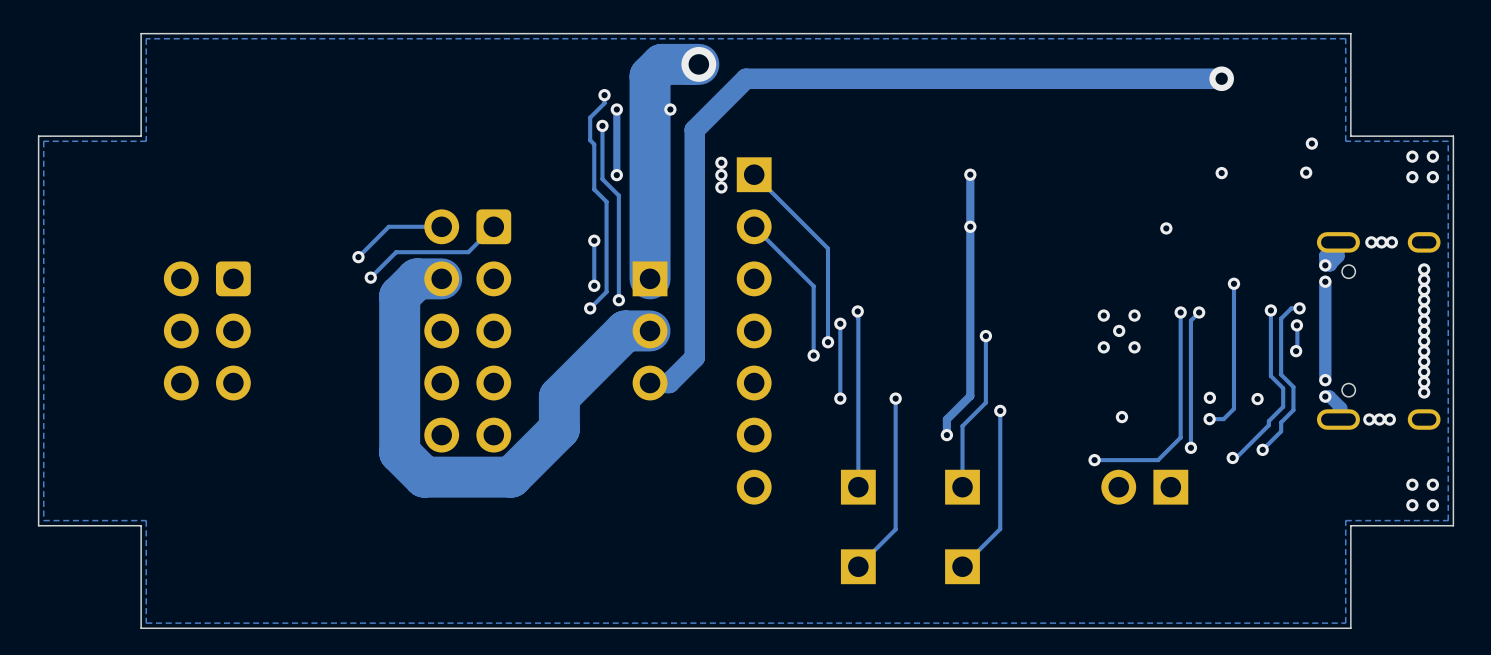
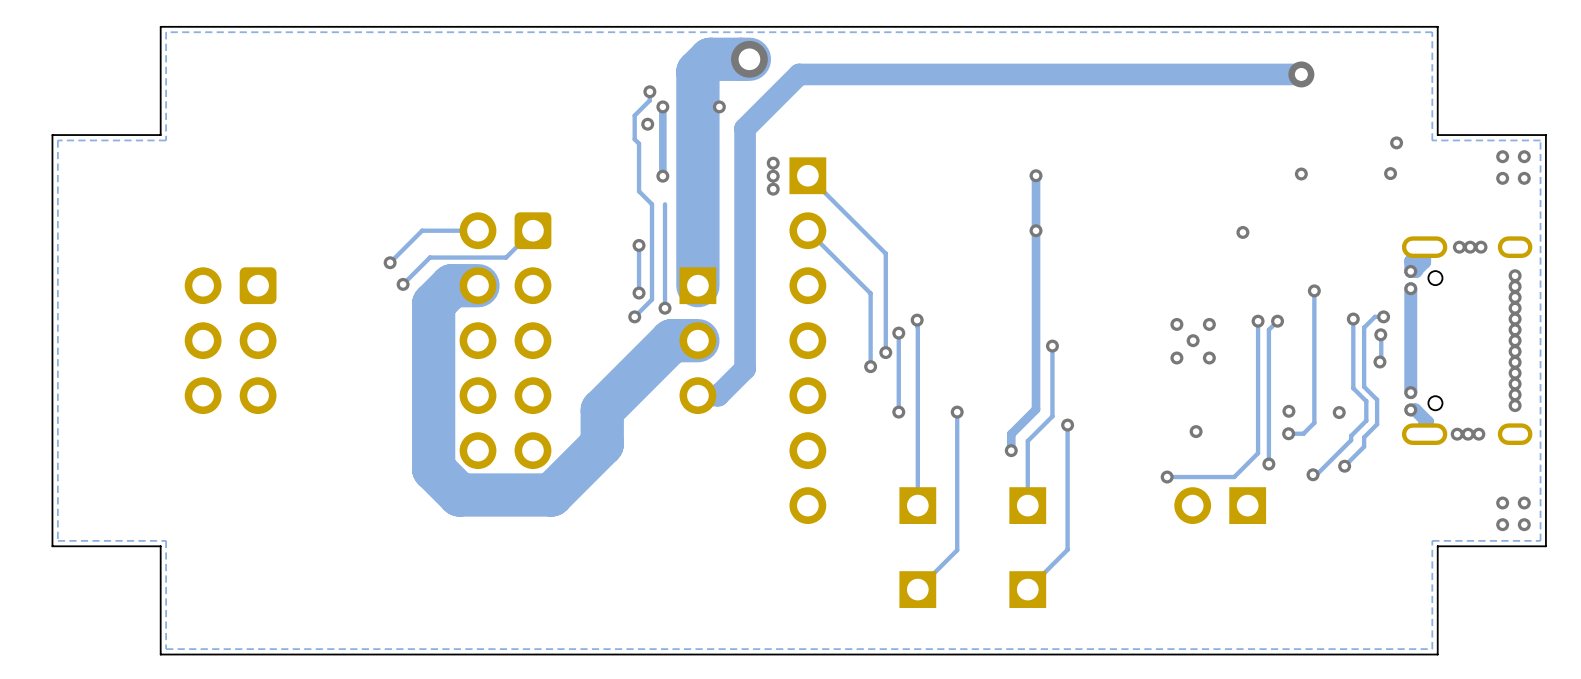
track: (602, 125) (602, 179) (618, 195) (618, 201) -> none

